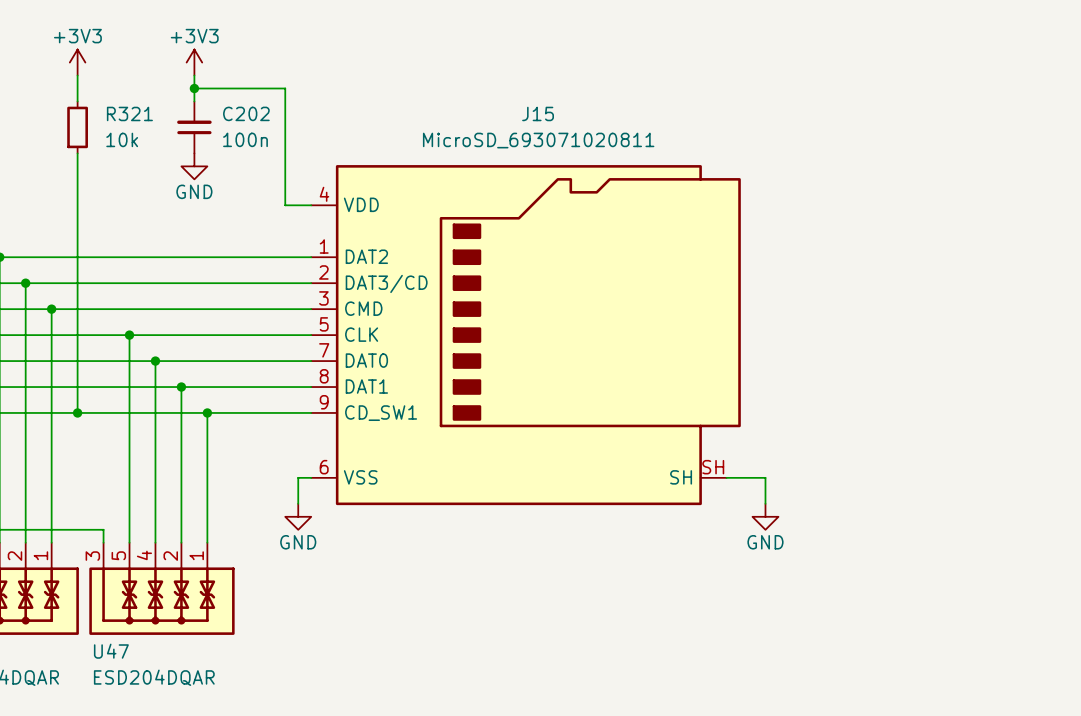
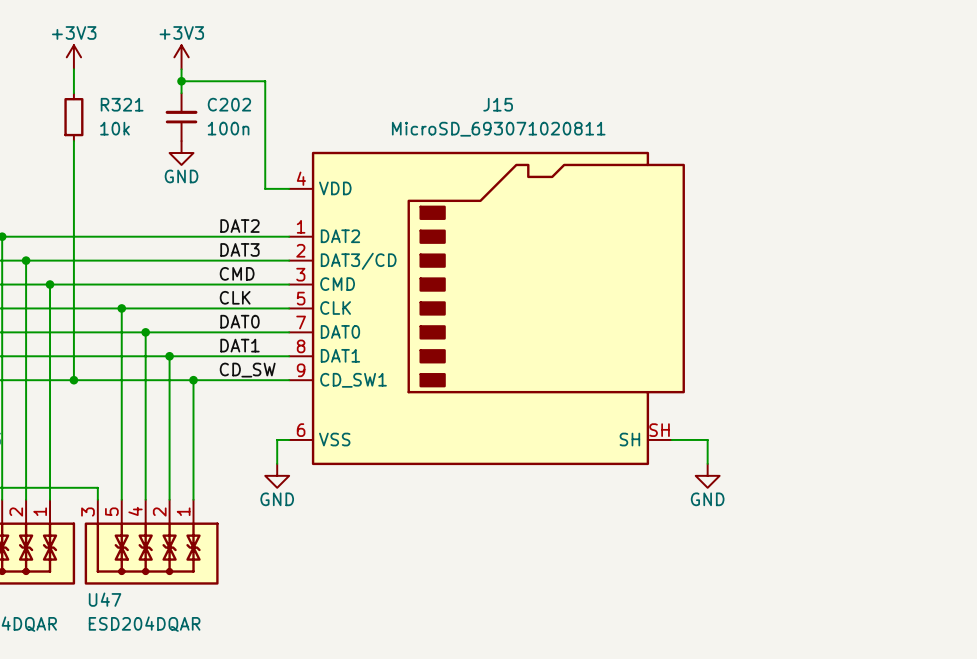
label: none -> DAT2 (239, 226)
label: none -> DAT3 (239, 249)
label: none -> CMD (237, 273)
label: none -> CLK (235, 297)
label: none -> DAT0 (239, 321)
label: none -> DAT1 (239, 345)
label: none -> CD_SW (247, 370)

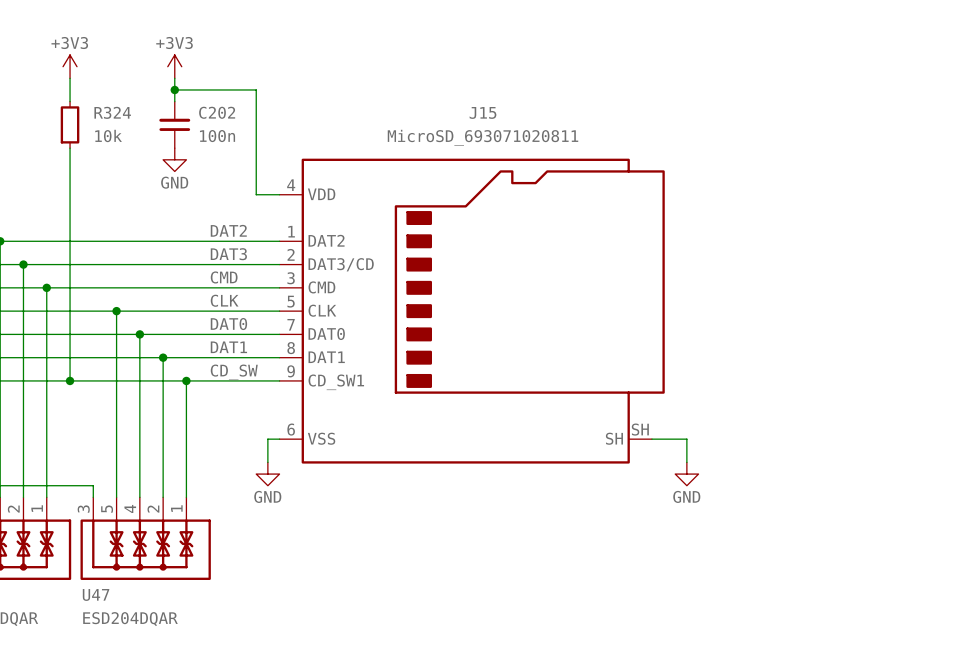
R321 name: R321 (122, 104) -> R324 (112, 112)

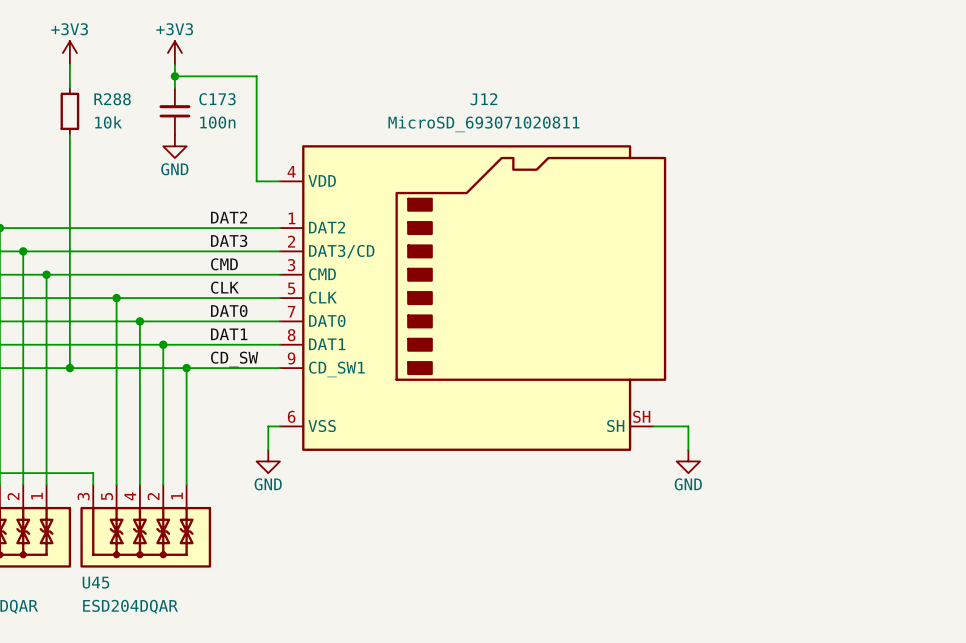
R324 name: R324 (112, 112) -> R288 (112, 99)
C202 name: C202 (217, 112) -> C173 (217, 99)
J15 name: J15 (482, 112) -> J12 (483, 99)
U47 name: U47 (96, 594) -> U45 (95, 582)

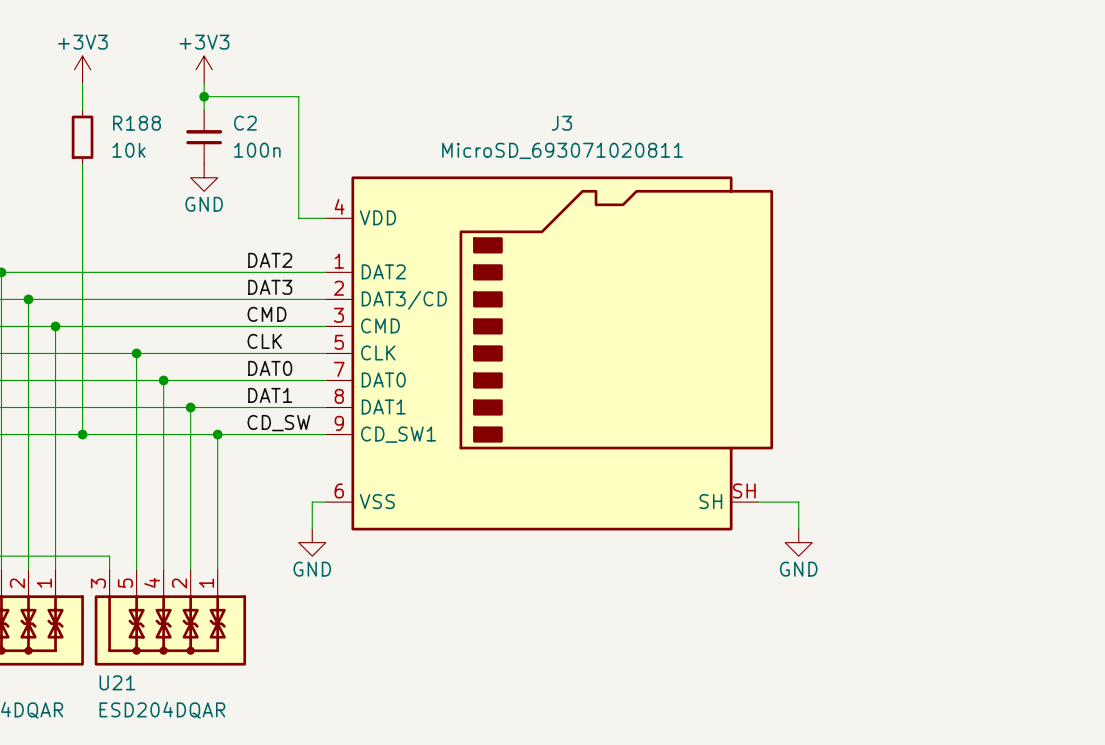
R288 name: R288 (112, 99) -> R188 (137, 123)
C173 name: C173 (217, 99) -> C2 (245, 123)
J12 name: J12 (483, 99) -> J3 (561, 123)
U45 name: U45 (95, 582) -> U21 (117, 682)

